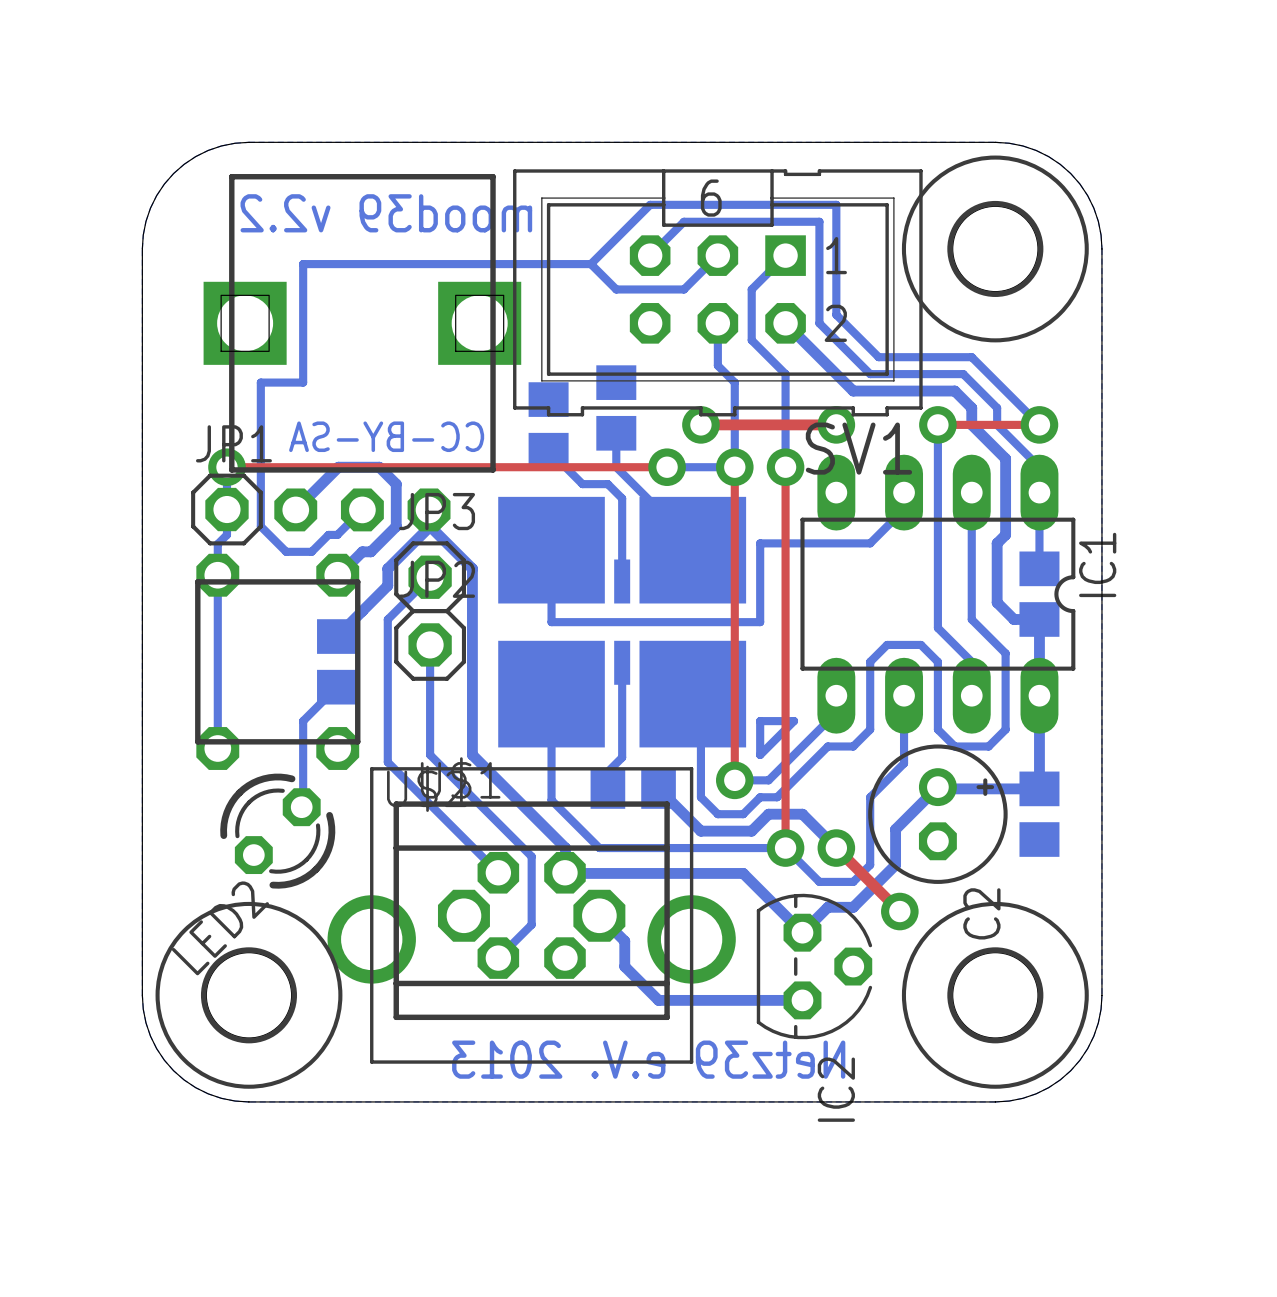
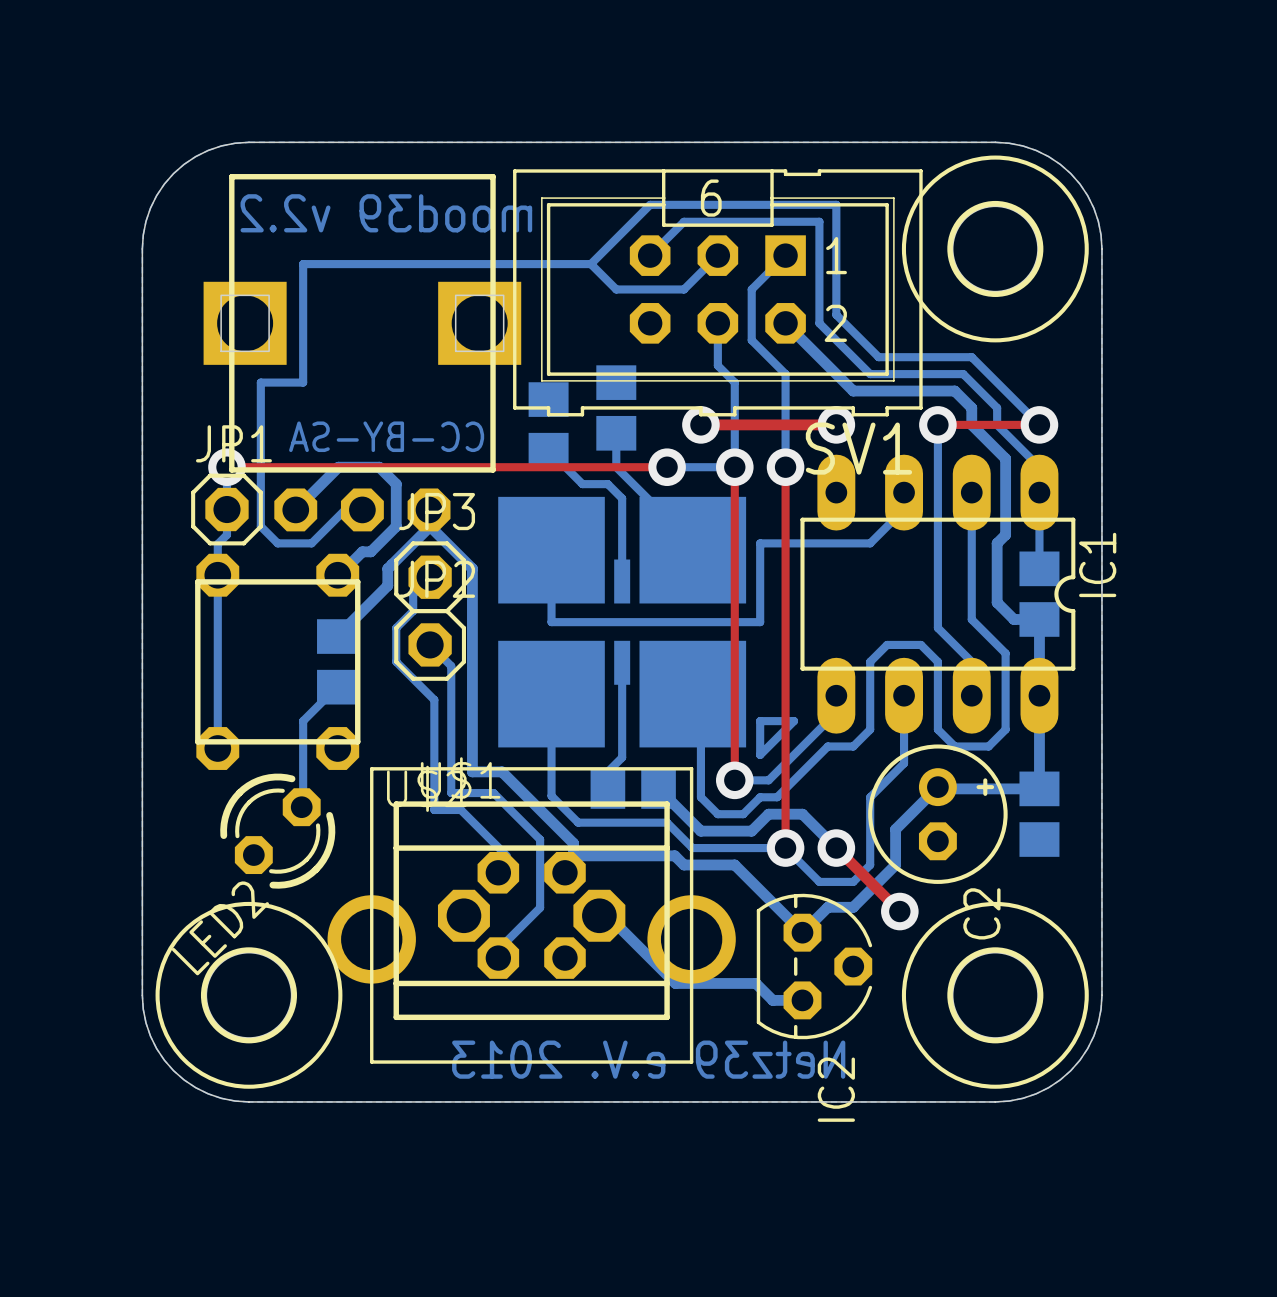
bottom track: (362, 509) (337, 534) (328, 534) (311, 551) (286, 551) (277, 543) -> (362, 509) (345, 509) (311, 543) (277, 543)
bottom track: (413, 594) (387, 619) (387, 762) (498, 872) -> (413, 594) (413, 611) (396, 628) (396, 661) (434, 699) (434, 809) (460, 809) (506, 855)
bottom track: (430, 644) (430, 754) (531, 856) (531, 924) (498, 958) -> (430, 644) (451, 666) (451, 793) (493, 793) (540, 839) (540, 907) (506, 941)
bottom track: (472, 754) (565, 848) (565, 873) (743, 873) -> (472, 754) (472, 771) (502, 771) (573, 843) (573, 855) (674, 855) (684, 864) (734, 864) (743, 873)
bottom track: (551, 795) (551, 800) (599, 848) (692, 848) -> (551, 795) (578, 822) (667, 822) (692, 848)
bottom track: (599, 915) (624, 941) (624, 966) (658, 1000) (772, 1000) -> (607, 898) (607, 915) (675, 983) (755, 983) (772, 1000)

